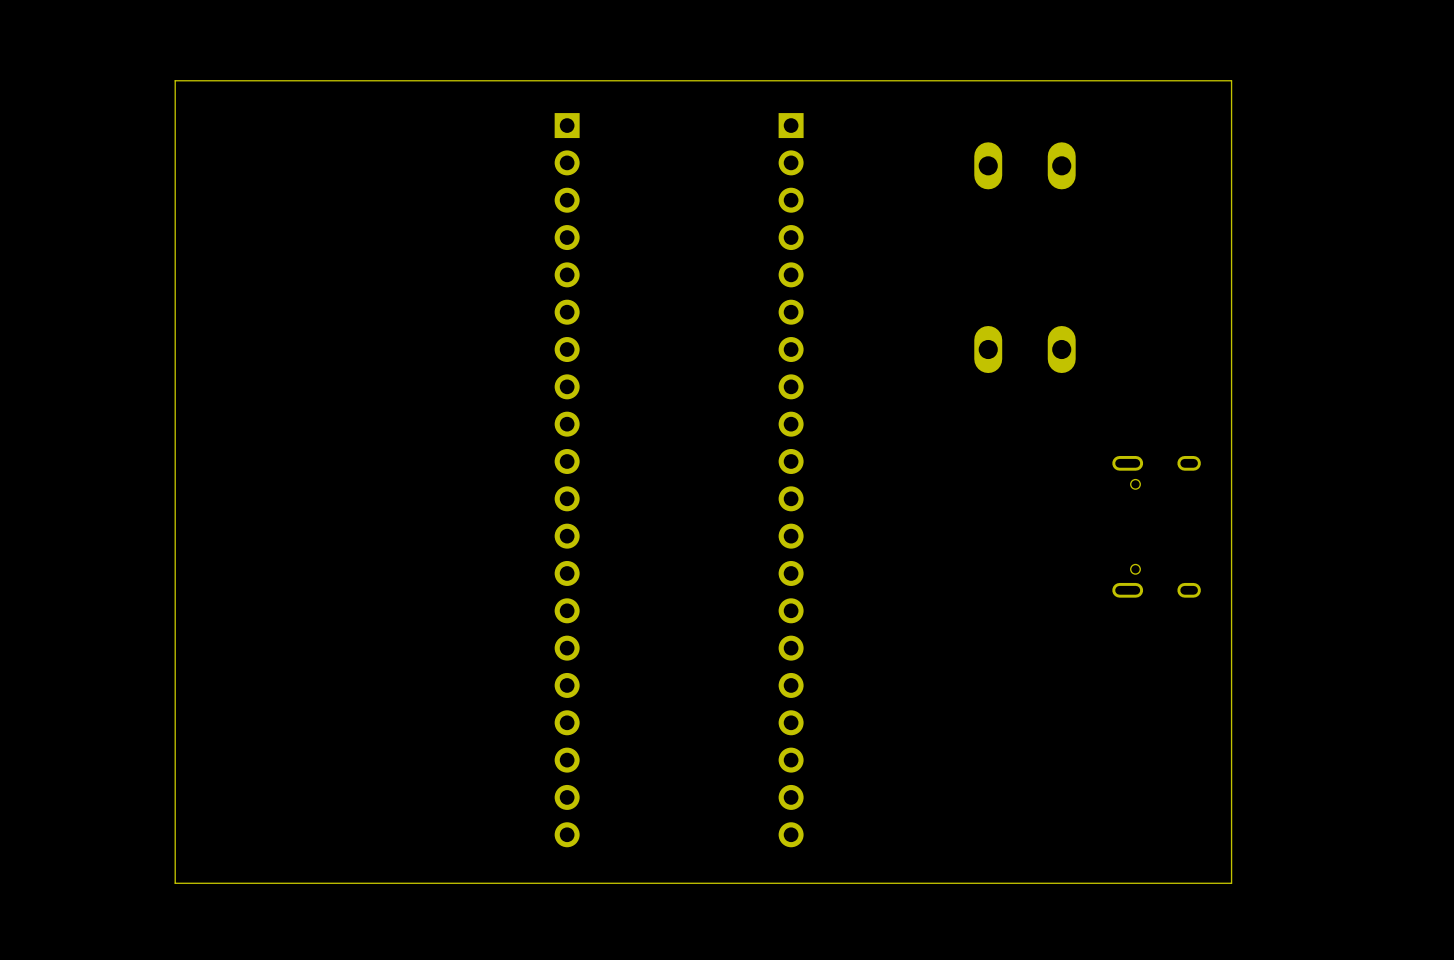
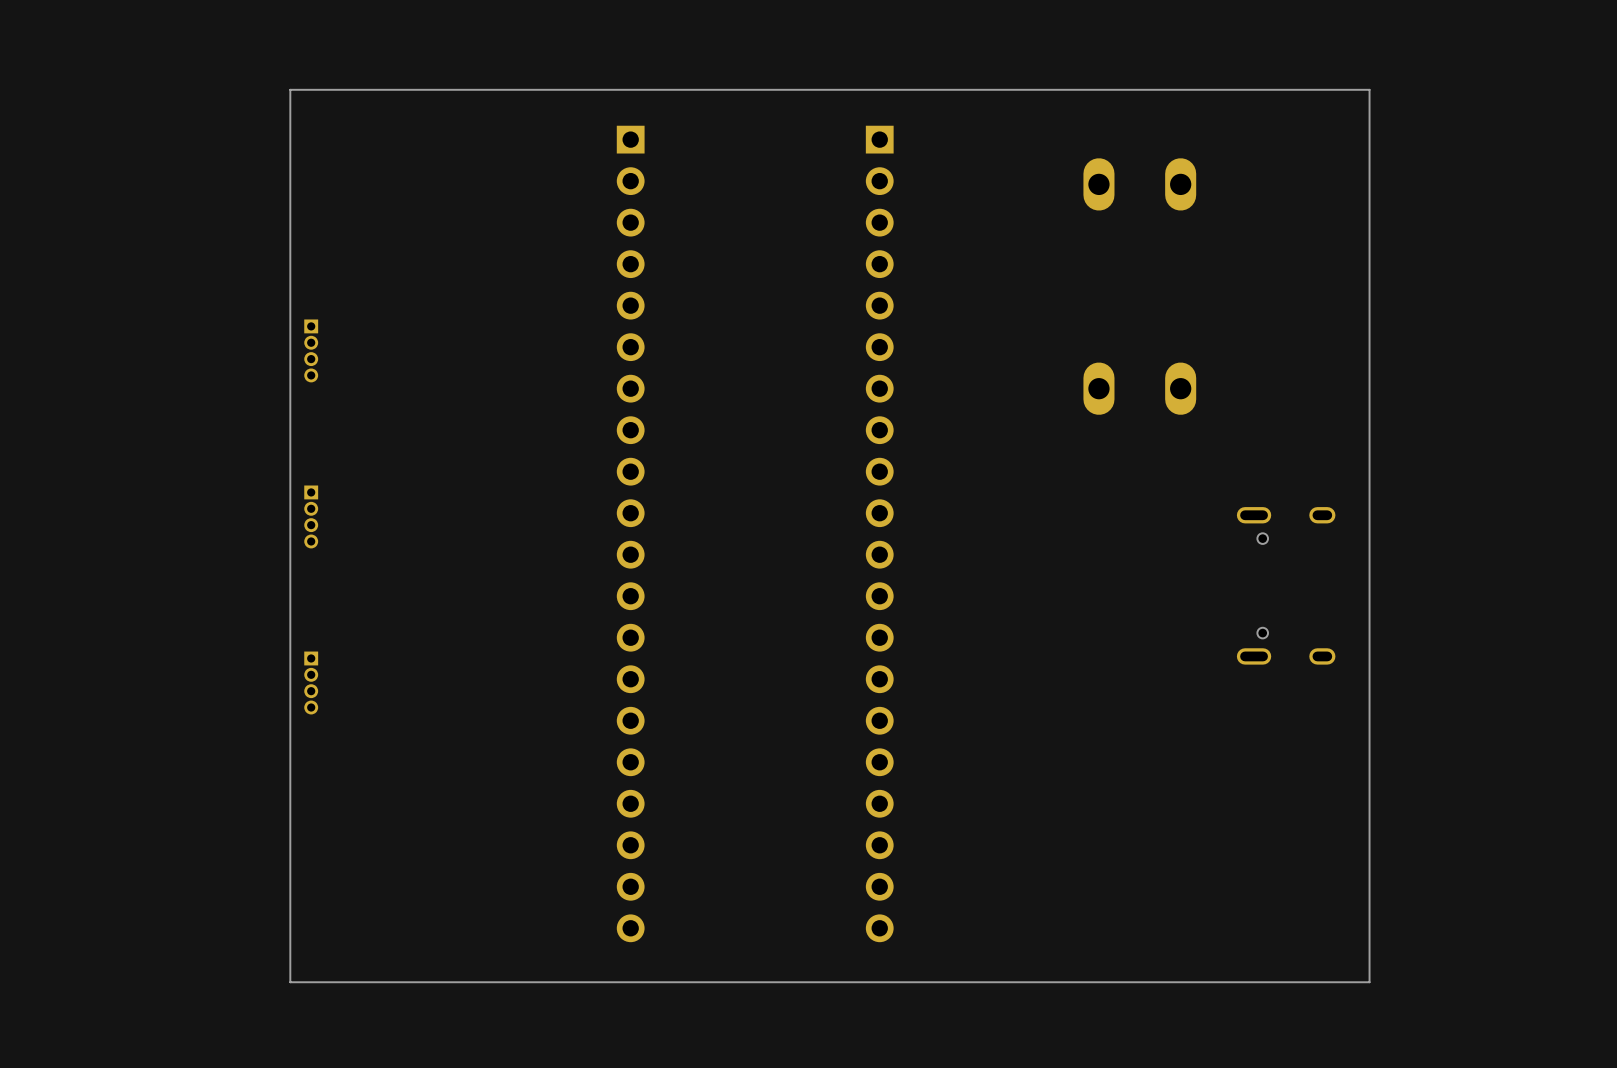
board edge: (261, 80) (175, 80) (175, 883) (261, 883) -> (290, 89) (290, 982)
part: none -> (311, 350)
part: none -> (311, 516)
part: none -> (311, 682)

